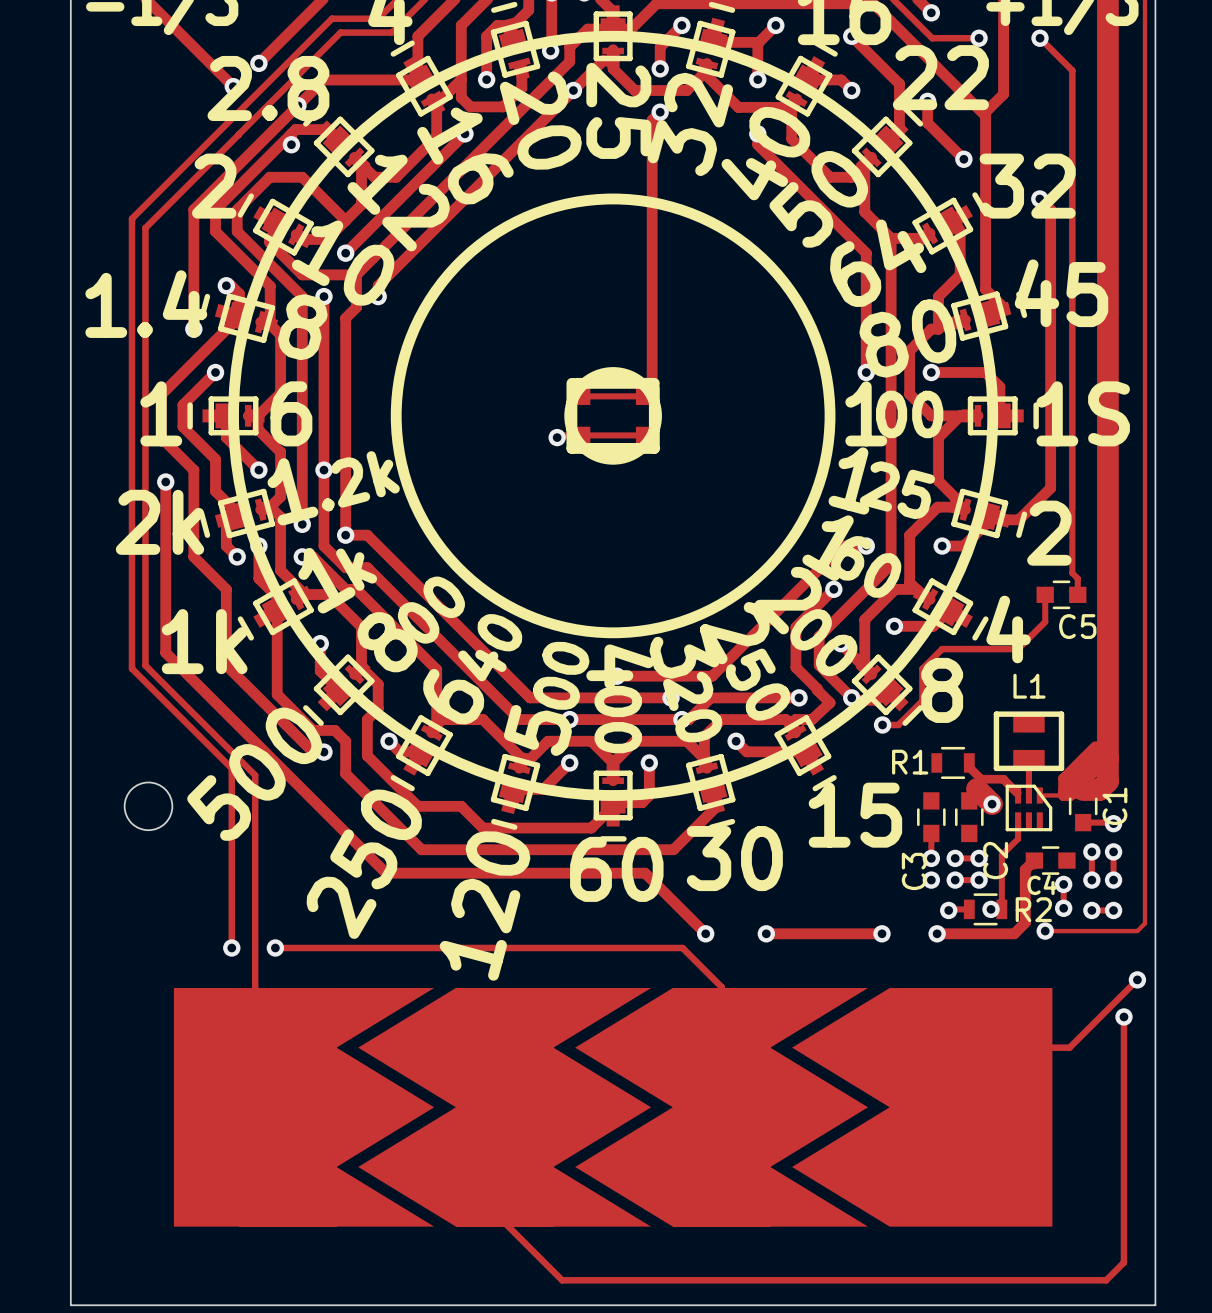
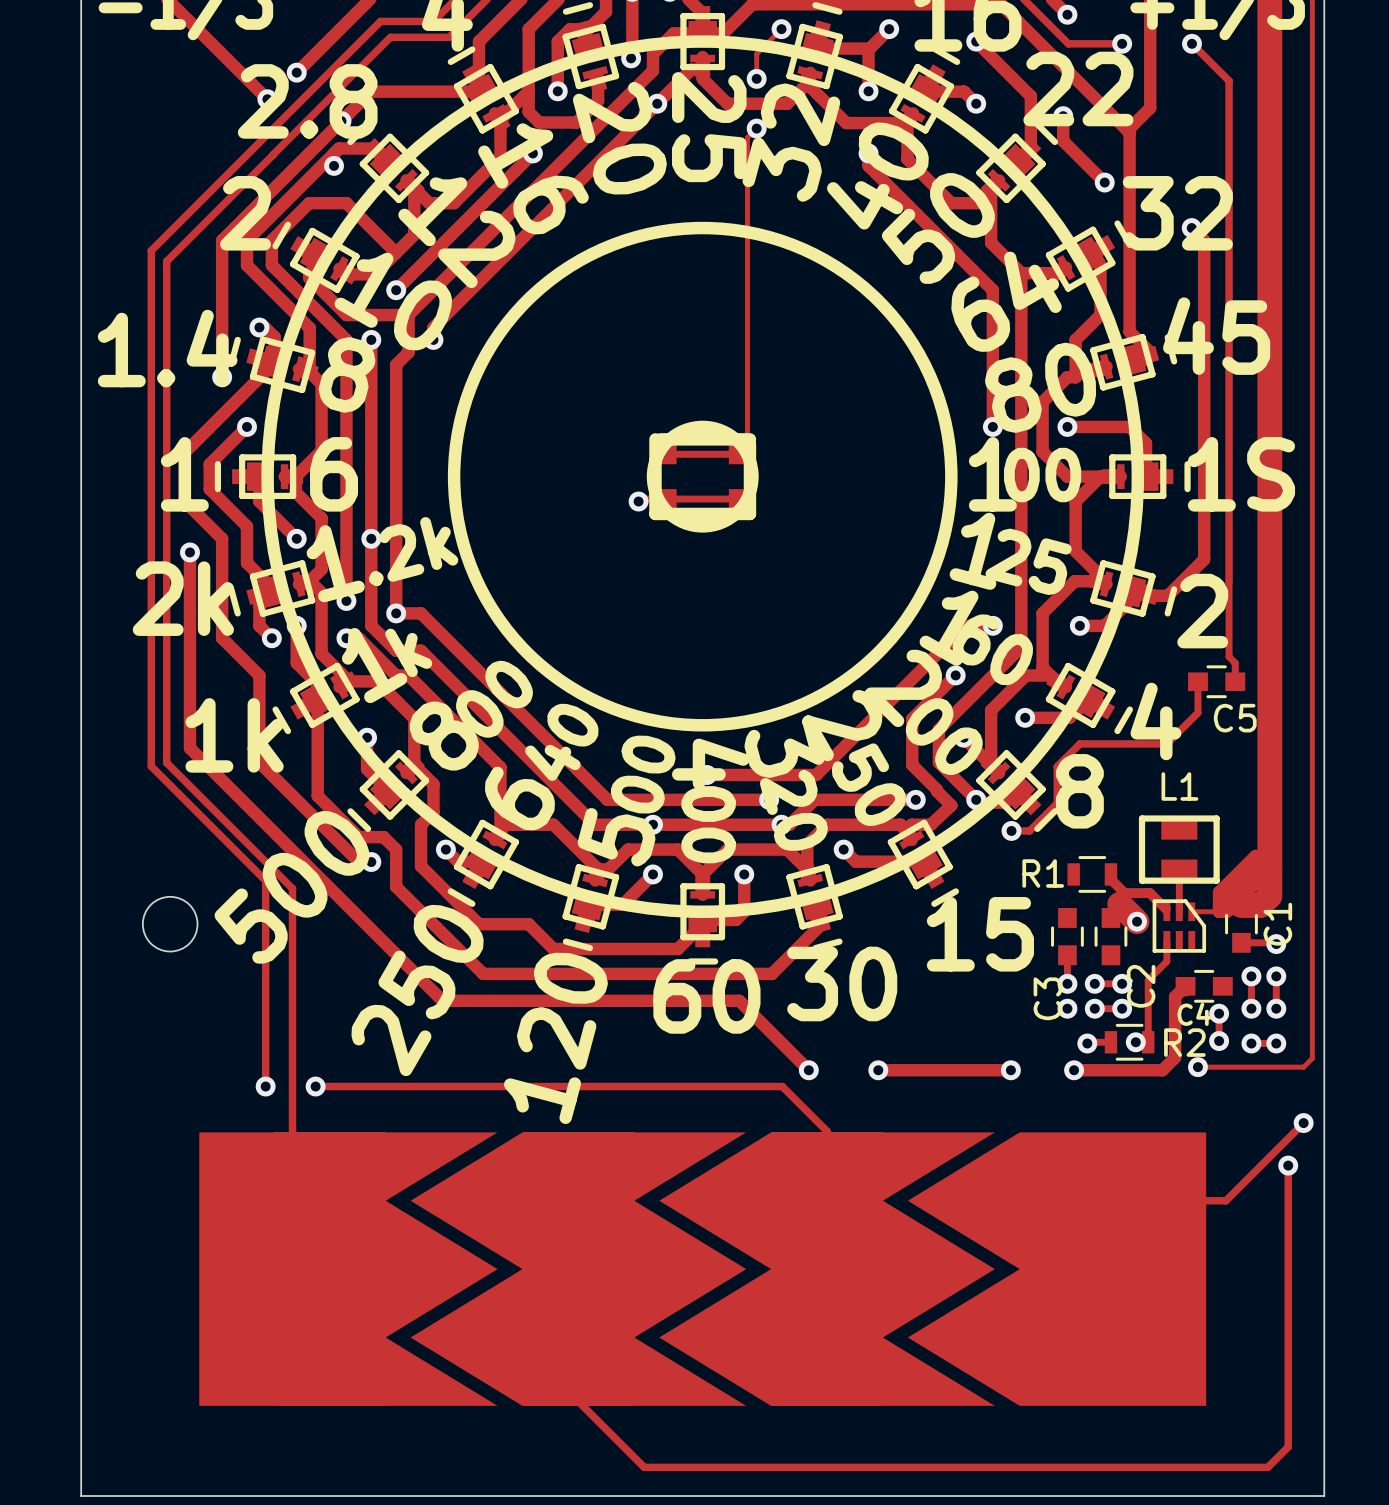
track width: thick (681, 25) (660, 47) (660, 68) -> thin (781, 29) (756, 54) (756, 78)
track width: thick (660, 112) (652, 120) (652, 388) (644, 396) -> thin (756, 128) (747, 137) (747, 444) (738, 454)

